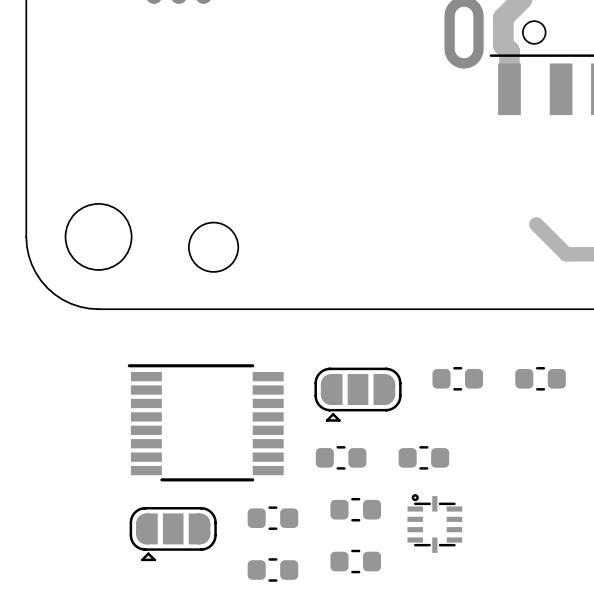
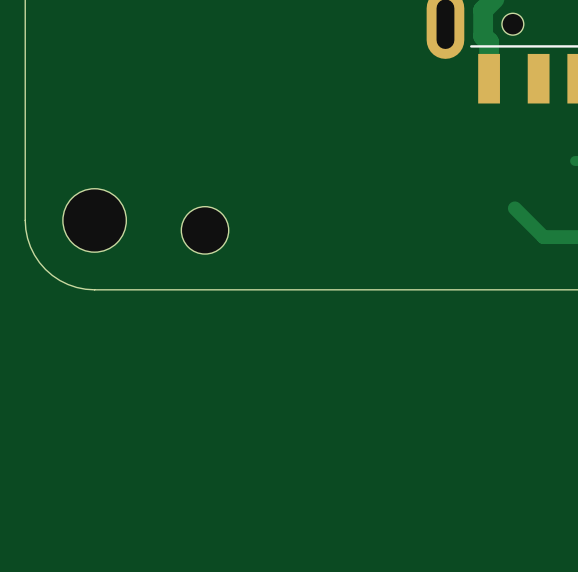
part: (457, 378) -> none
part: (540, 378) -> none
part: (358, 394) -> none
part: (205, 422) -> none
part: (341, 457) -> none
part: (423, 457) -> none
part: (355, 509) -> none
part: (272, 518) -> none
part: (434, 523) -> none
part: (173, 534) -> none
part: (355, 561) -> none
part: (272, 570) -> none

